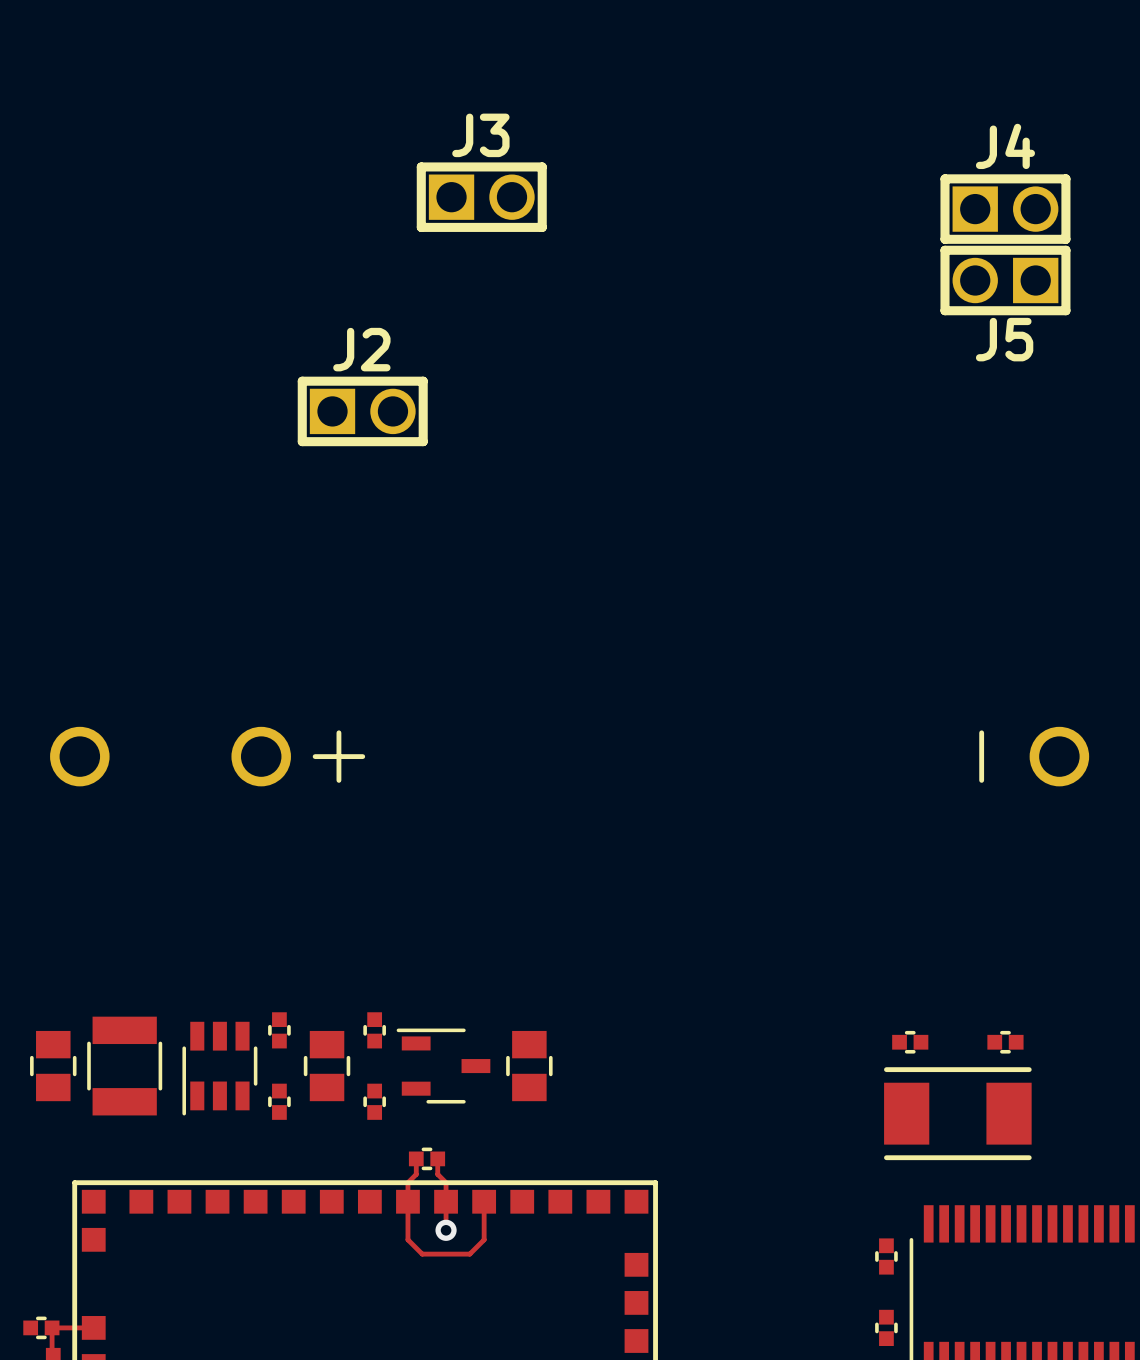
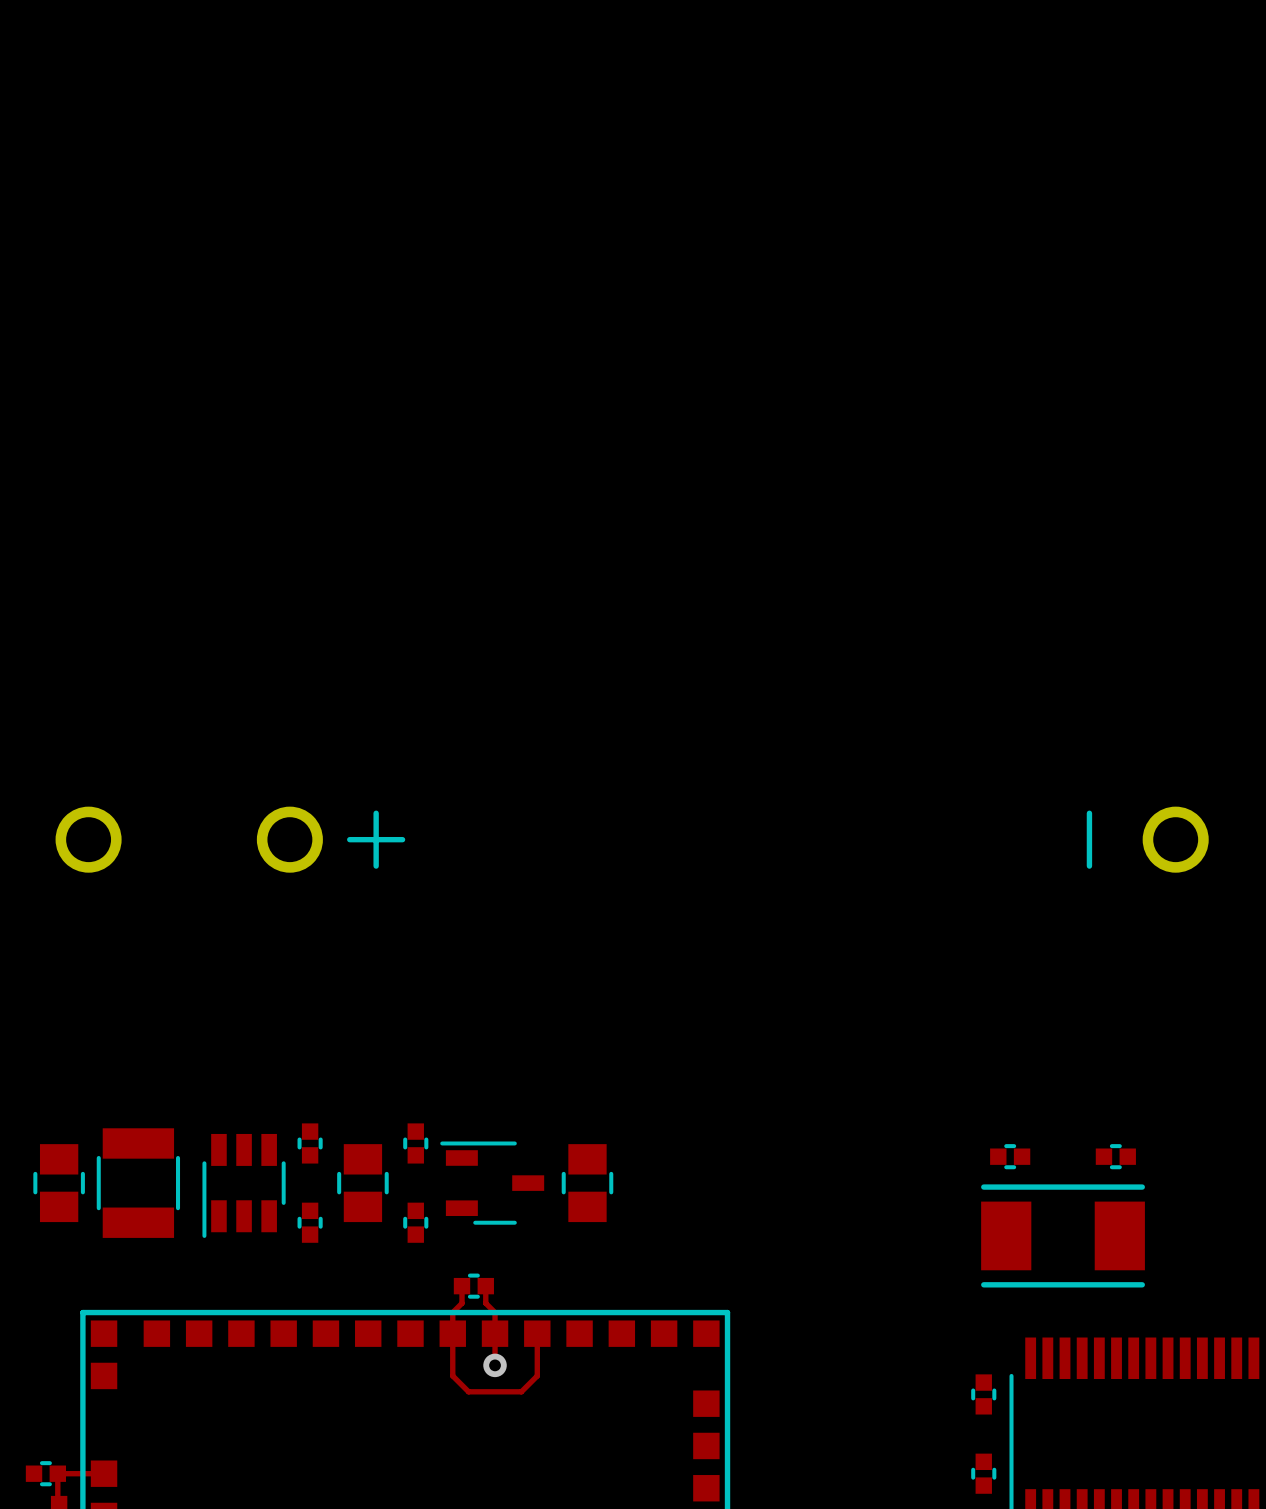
J3: (481, 197) -> none
J4: (1005, 209) -> none
J5: (1005, 280) -> none
J2: (362, 411) -> none

